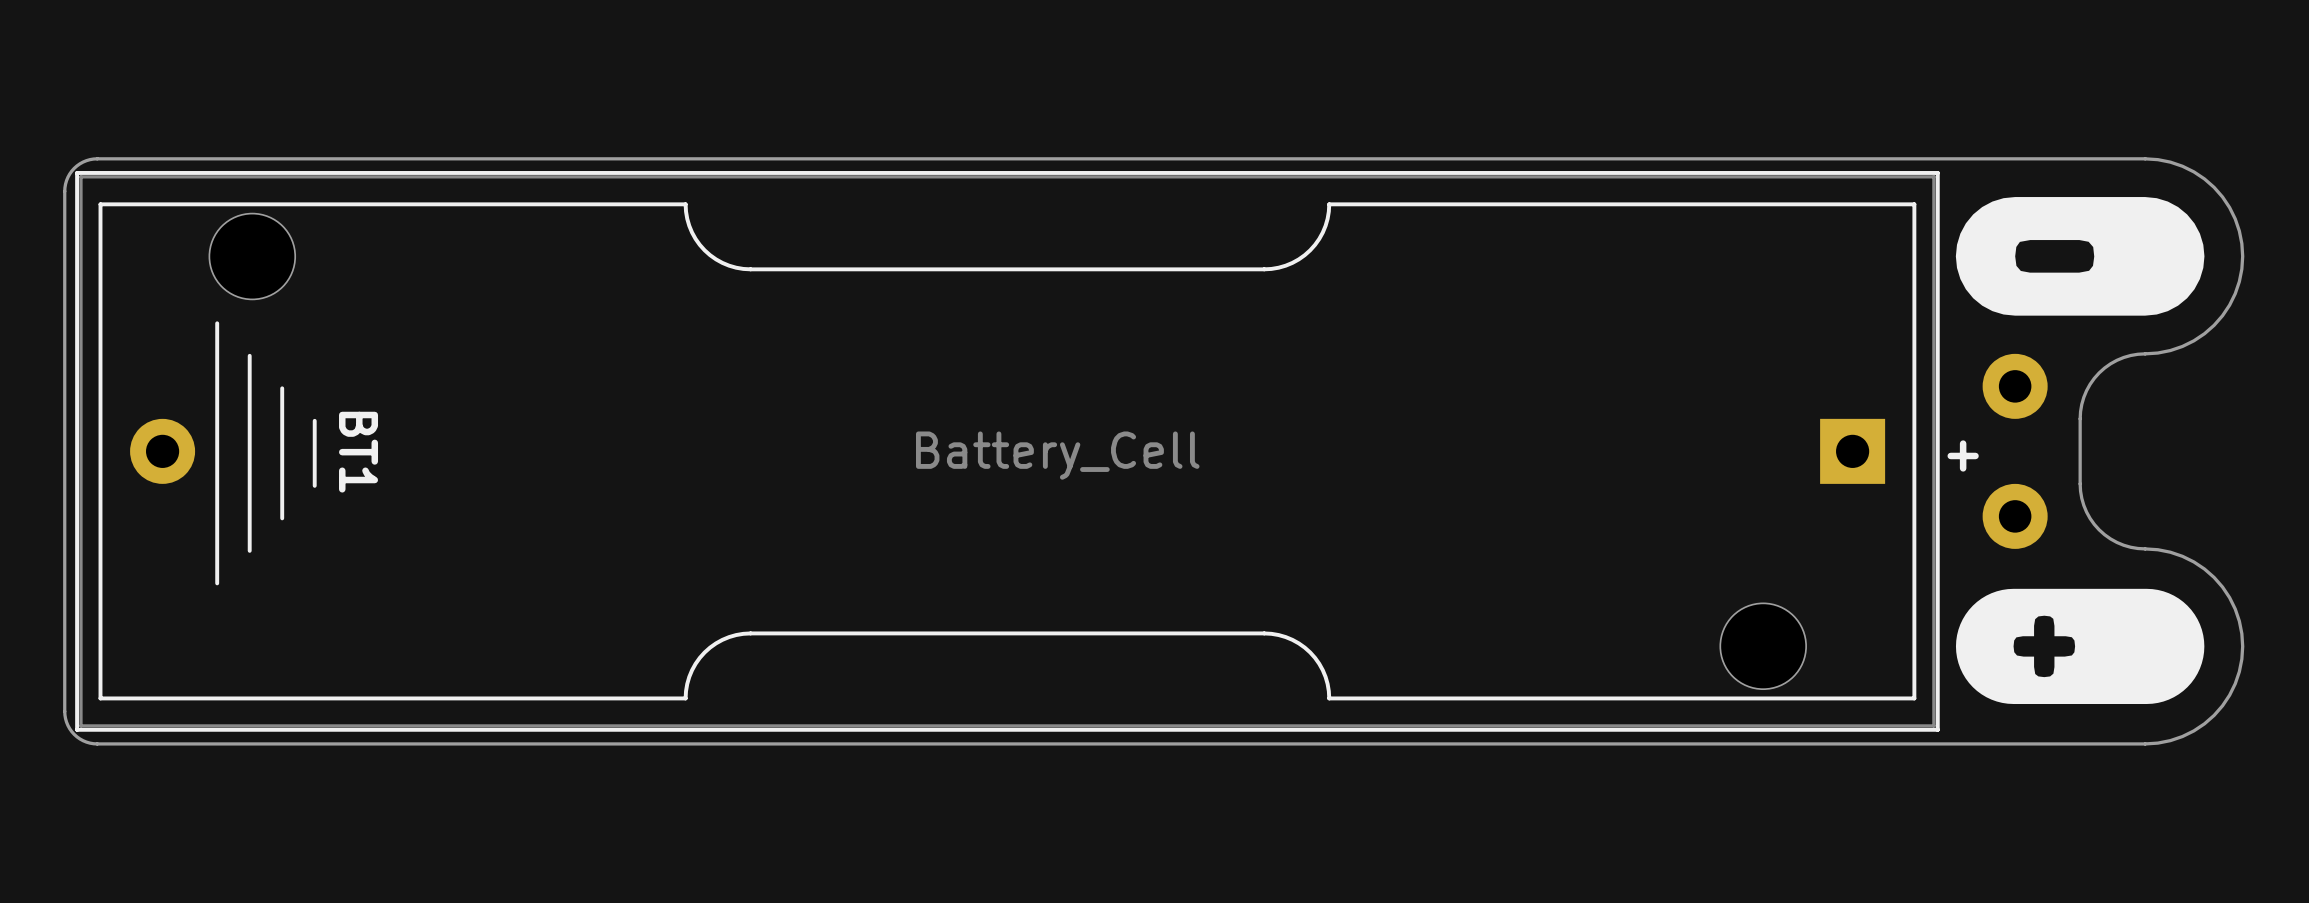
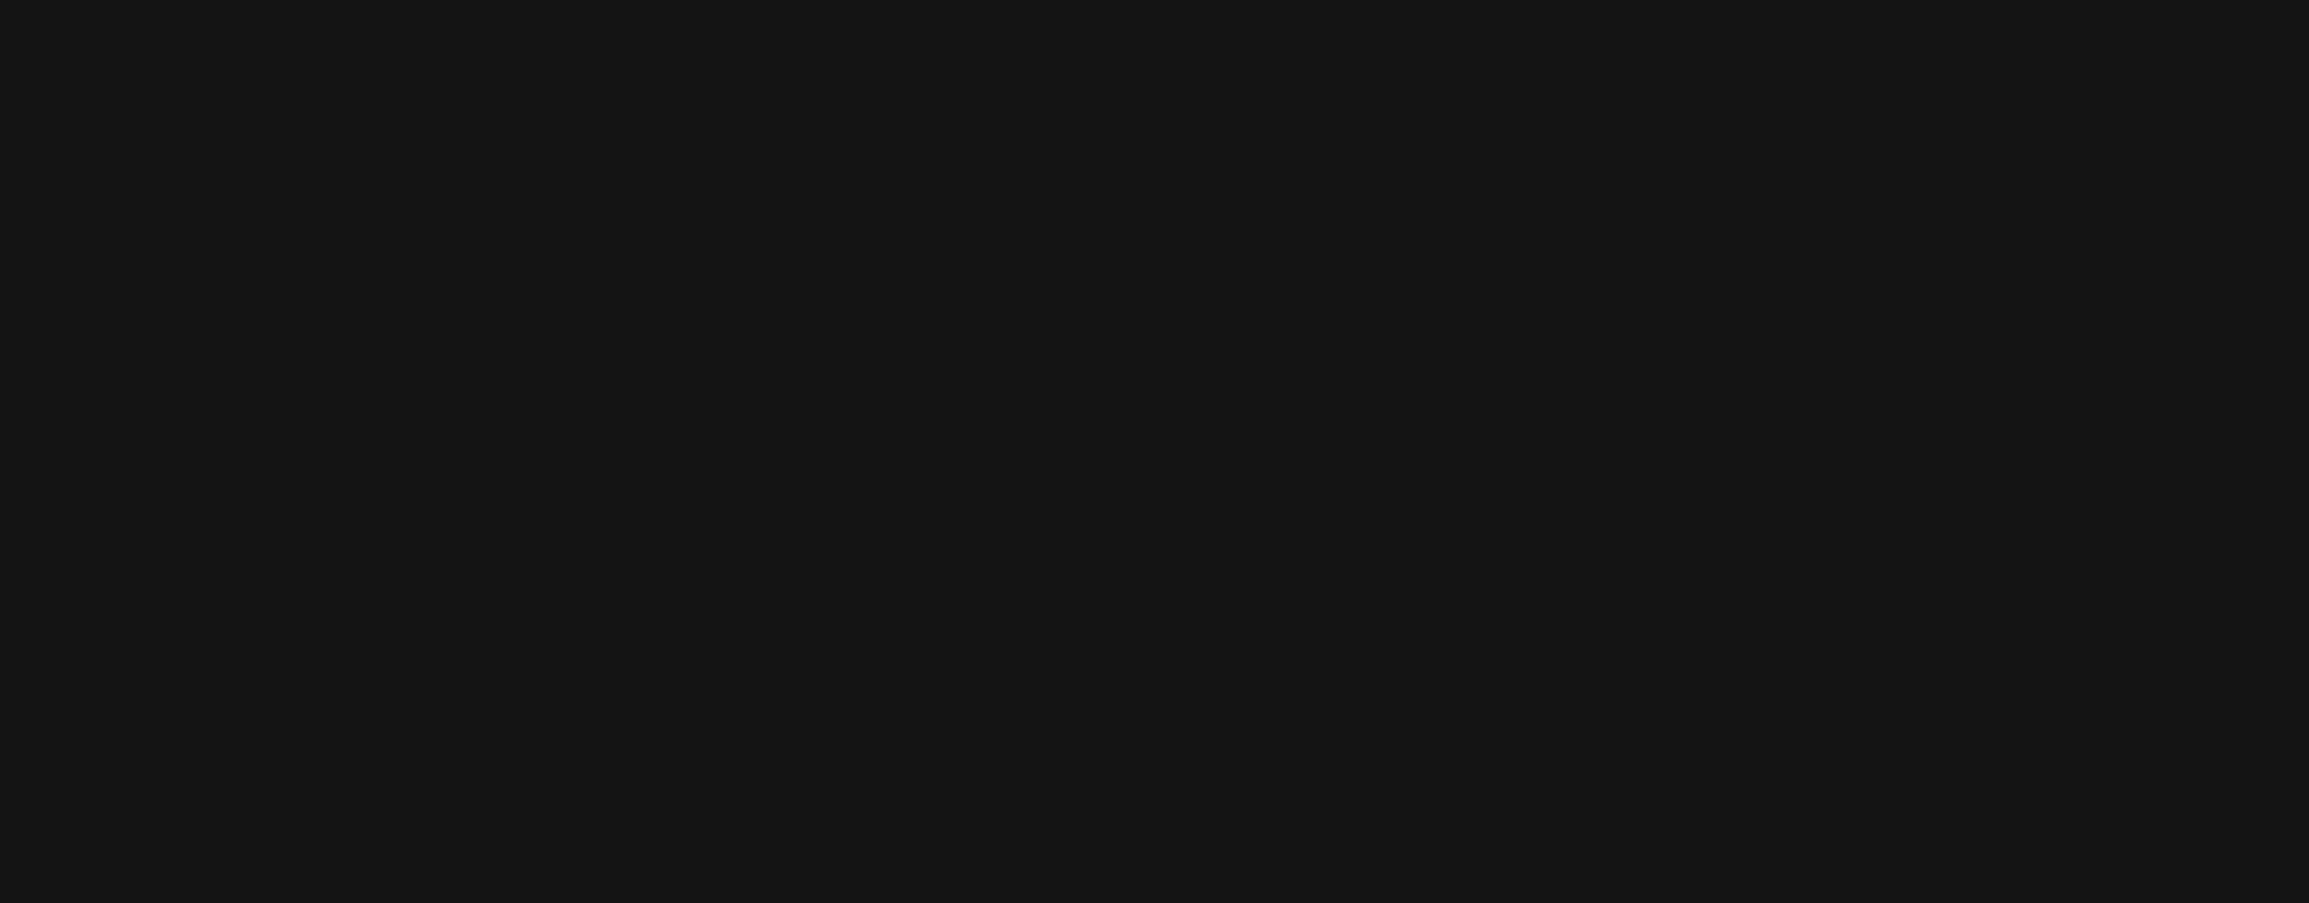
board edge: (2145, 158) (90, 159) (79, 163) (71, 171) (66, 180) (64, 191) (65, 718) (69, 728) (76, 736) (86, 742) (97, 743) (2145, 743) (2170, 740) (2182, 736) (2204, 723) (2214, 715) (2229, 695) (2235, 683) (2241, 659) (2241, 633) (2239, 621) (2235, 609) (2222, 587) (2214, 577) (2193, 561) (2170, 552) (2123, 545) (2104, 534) (2094, 524) (2083, 505) (2080, 491) (2080, 411) (2083, 397) (2090, 384) (2099, 372) (2110, 363) (2130, 355) (2157, 353) (2182, 346) (2193, 340) (2214, 325) (2229, 305) (2235, 293) (2241, 269) (2242, 256) (2241, 243) (2235, 219) (2229, 207) (2214, 187) (2193, 171) (2182, 166) (2157, 159) (2145, 158) -> none
drawing: [1955, 197, 2205, 316] -> none
part: (2015, 386) -> none
BT1: Battery_Cell (1007, 451) -> none
part: (2015, 516) -> none
drawing: [1955, 588, 2205, 705] -> none

